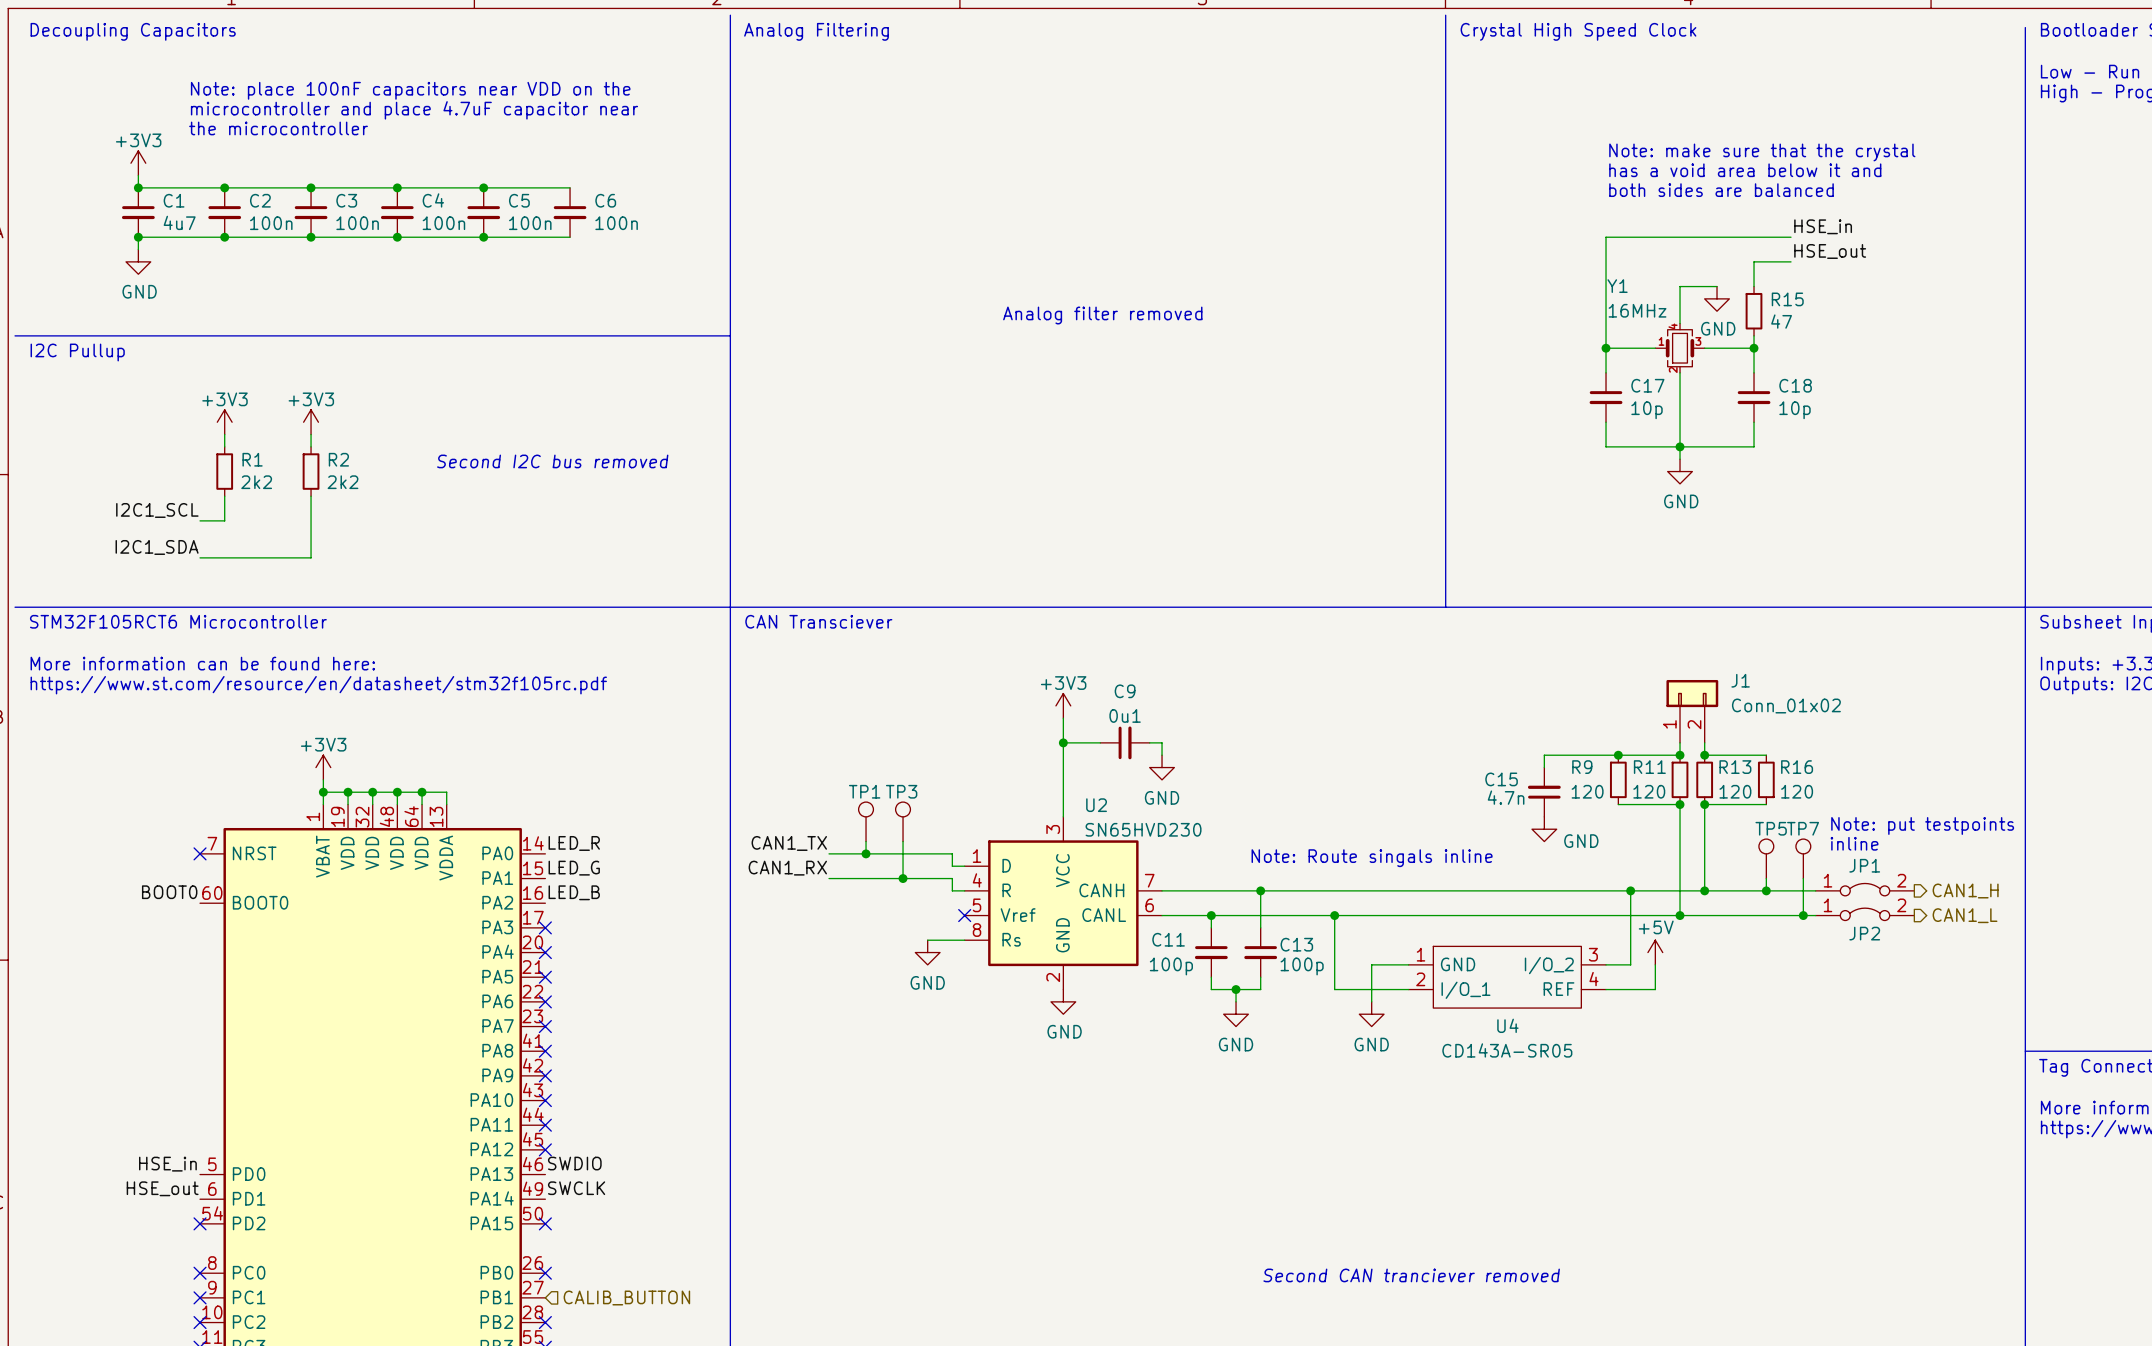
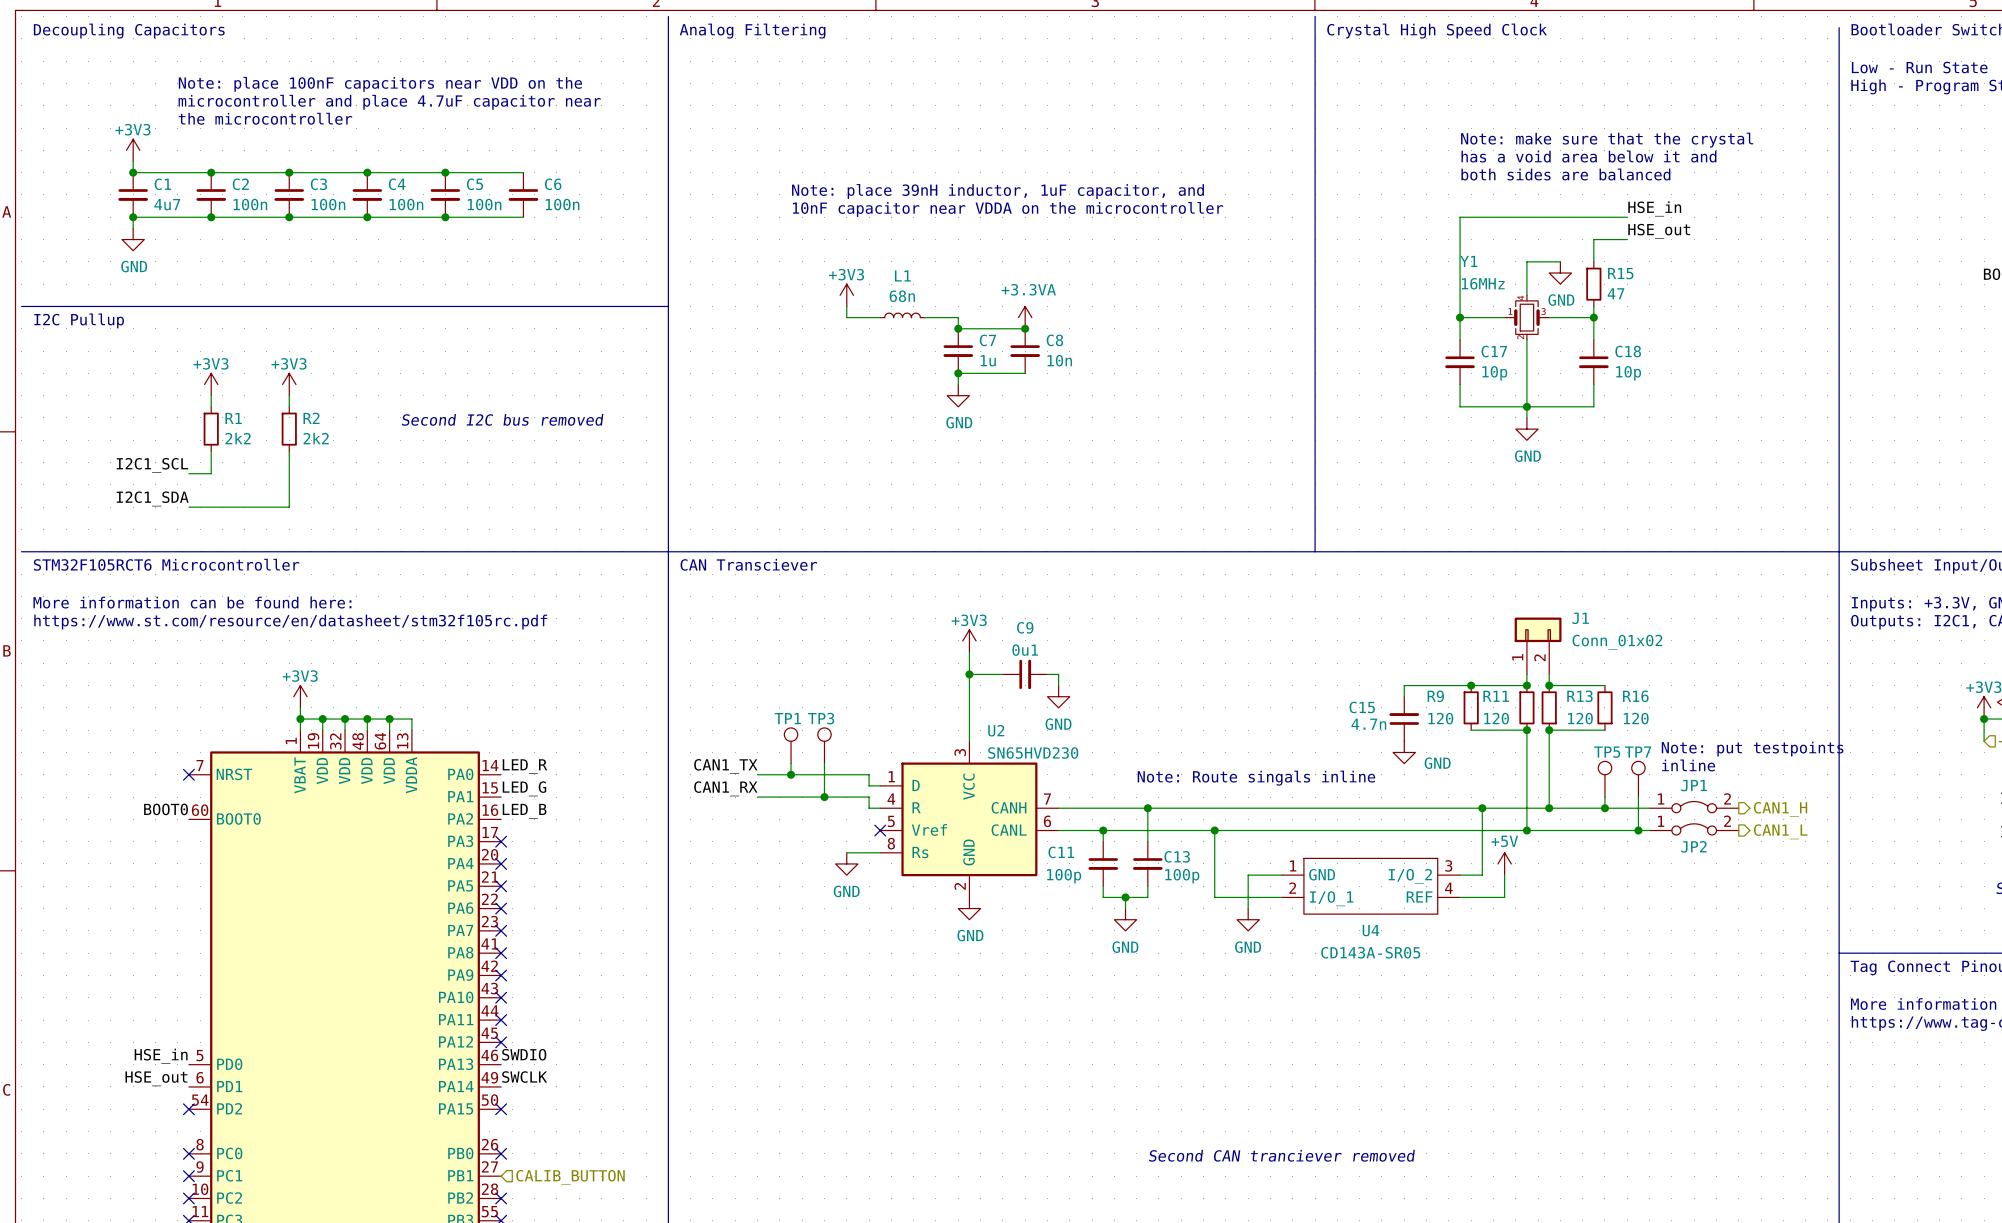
text: none -> Note: place 39nH inductor, 1uF capacitor, and (998, 191)
text: none -> 10nF capacitor near VDDA on the microcontroller (1008, 209)
text: Analog filter removed (1102, 315) -> none
power symbol: none -> +3V3 (846, 295)
wire: none -> (846, 306) (846, 317) (880, 317)
L1: none -> 68n (902, 315)
wire: none -> (924, 317) (958, 317) (958, 328) (1025, 328)
power symbol: none -> +3.3VA (1025, 317)
junction: none -> (958, 328)
junction: none -> (1025, 328)
C7: none -> 1u (958, 351)
C8: none -> 10n (1025, 351)
junction: none -> (958, 373)
wire: none -> (1025, 373) (958, 373) (958, 384)
power symbol: none -> GND (958, 395)

